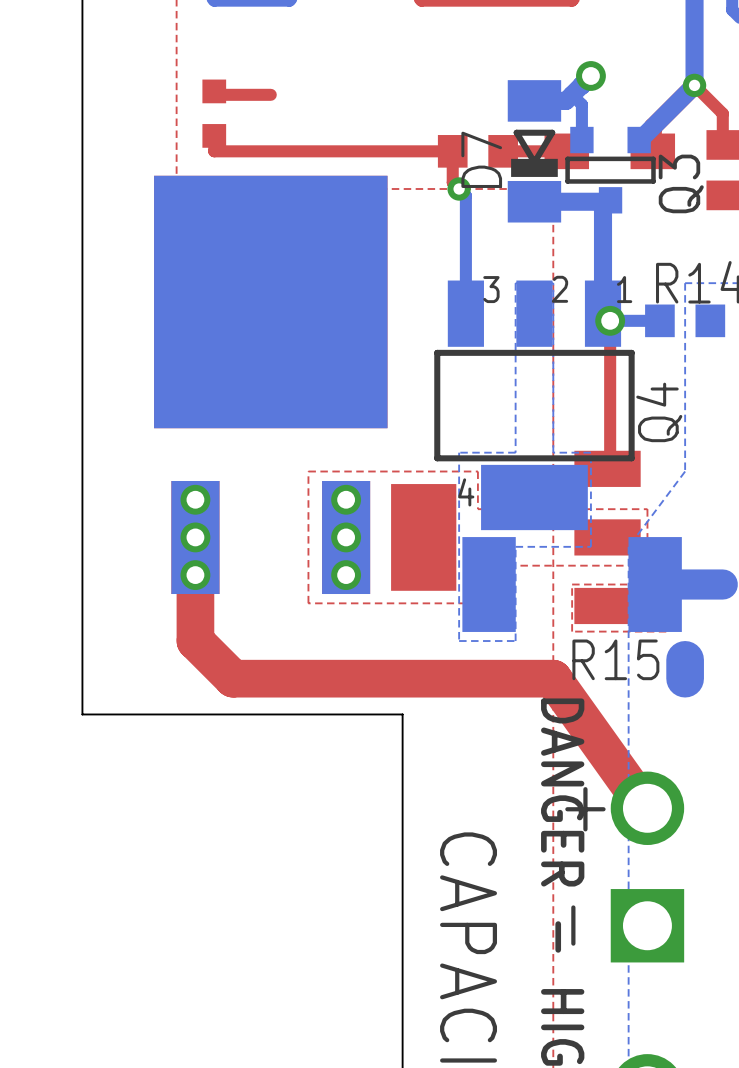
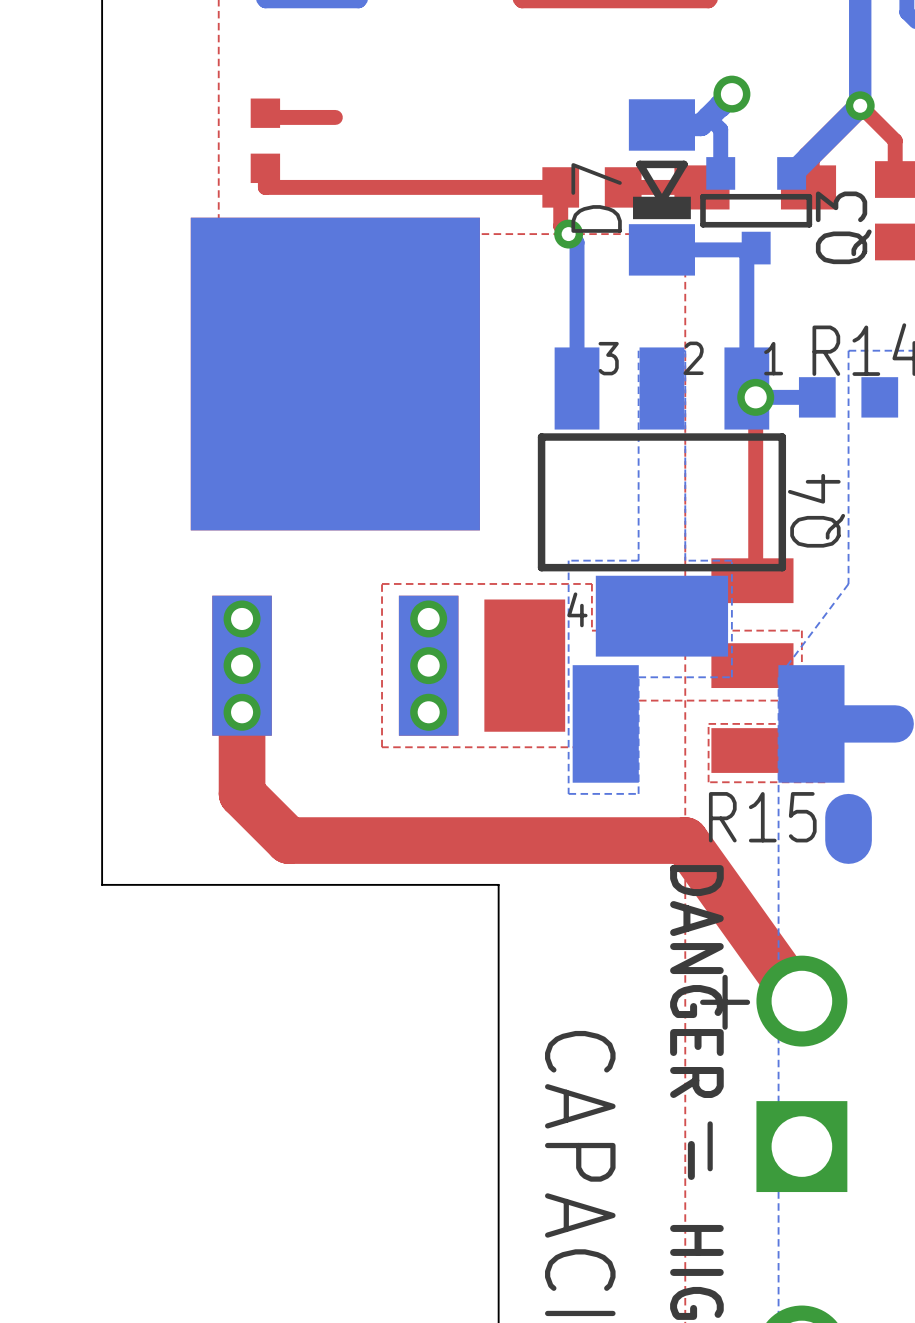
bottom track width: thick (609, 201) (534, 201) -> thin (754, 249) (661, 249)
bottom track width: thick (603, 207) (603, 313) -> thin (746, 257) (746, 388)

